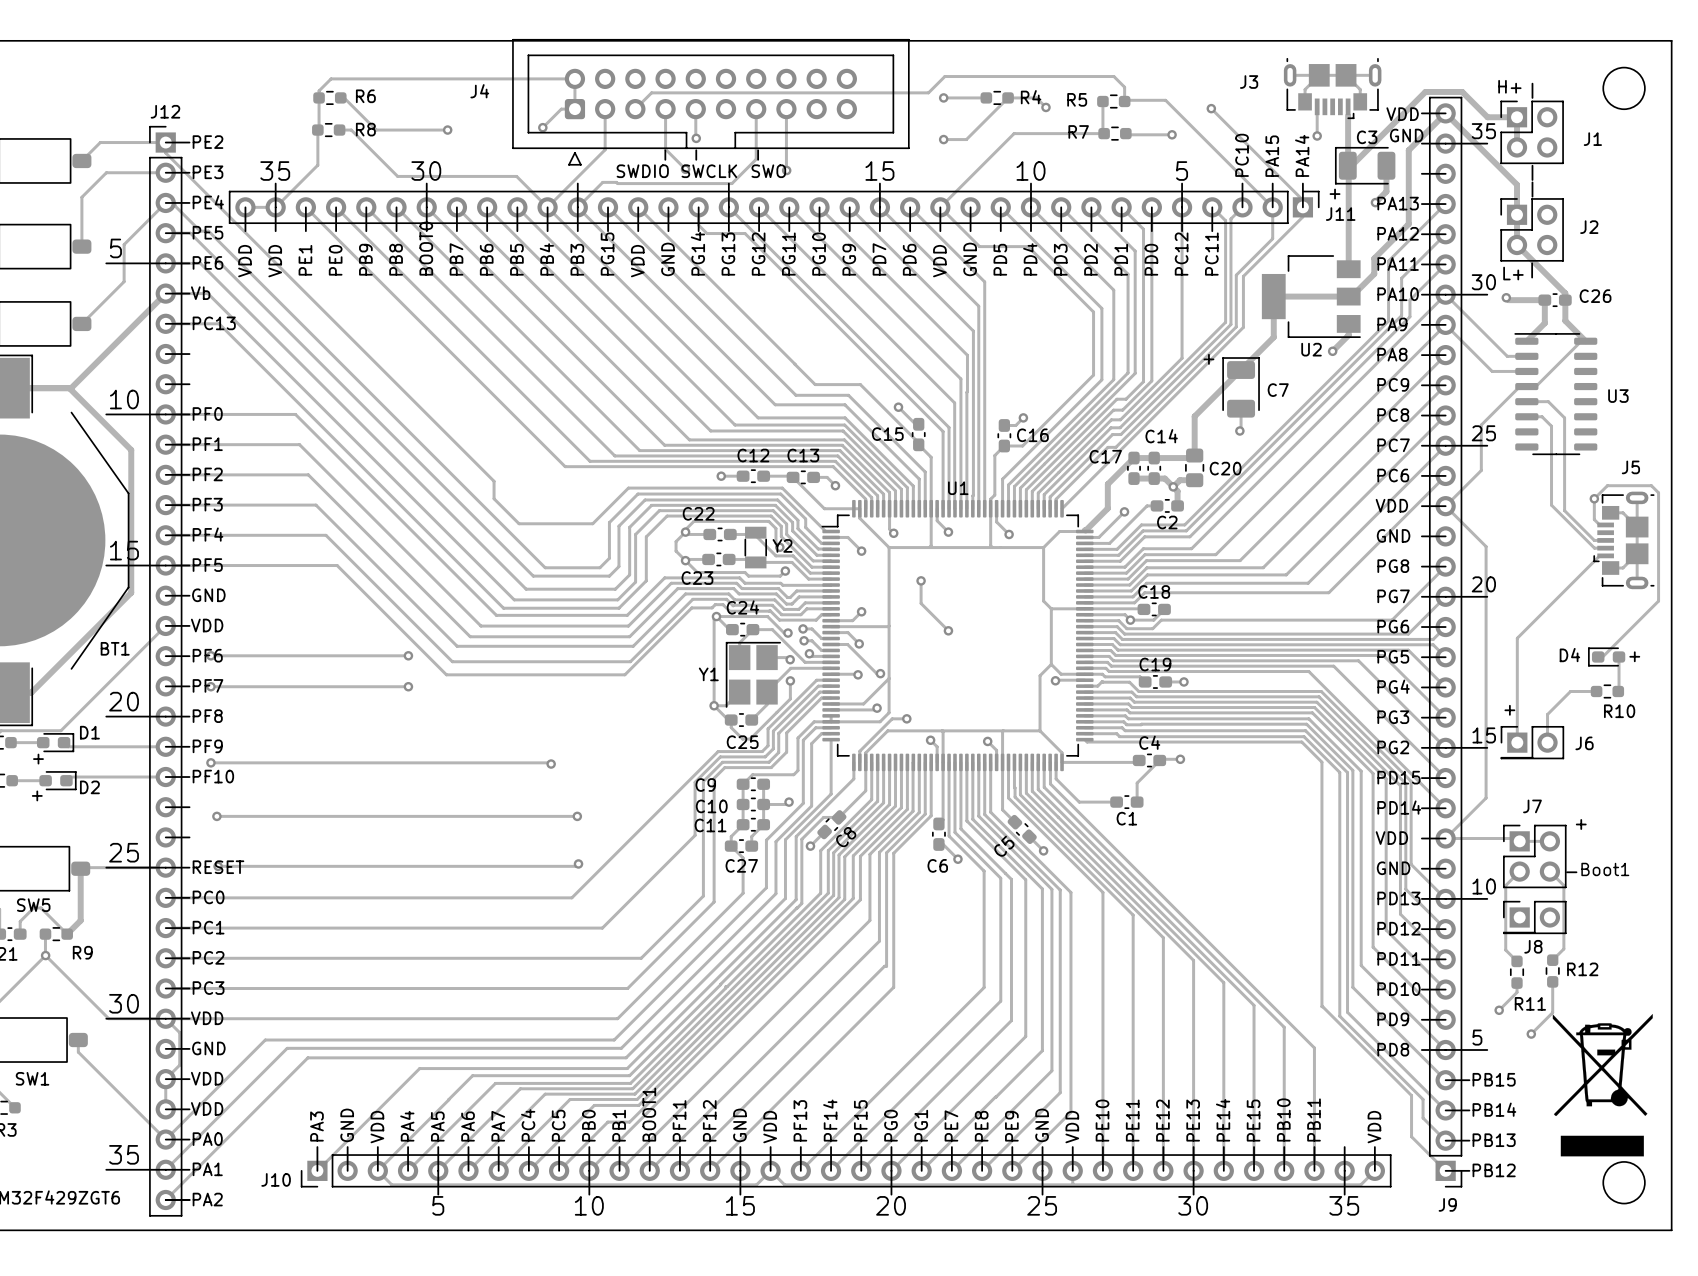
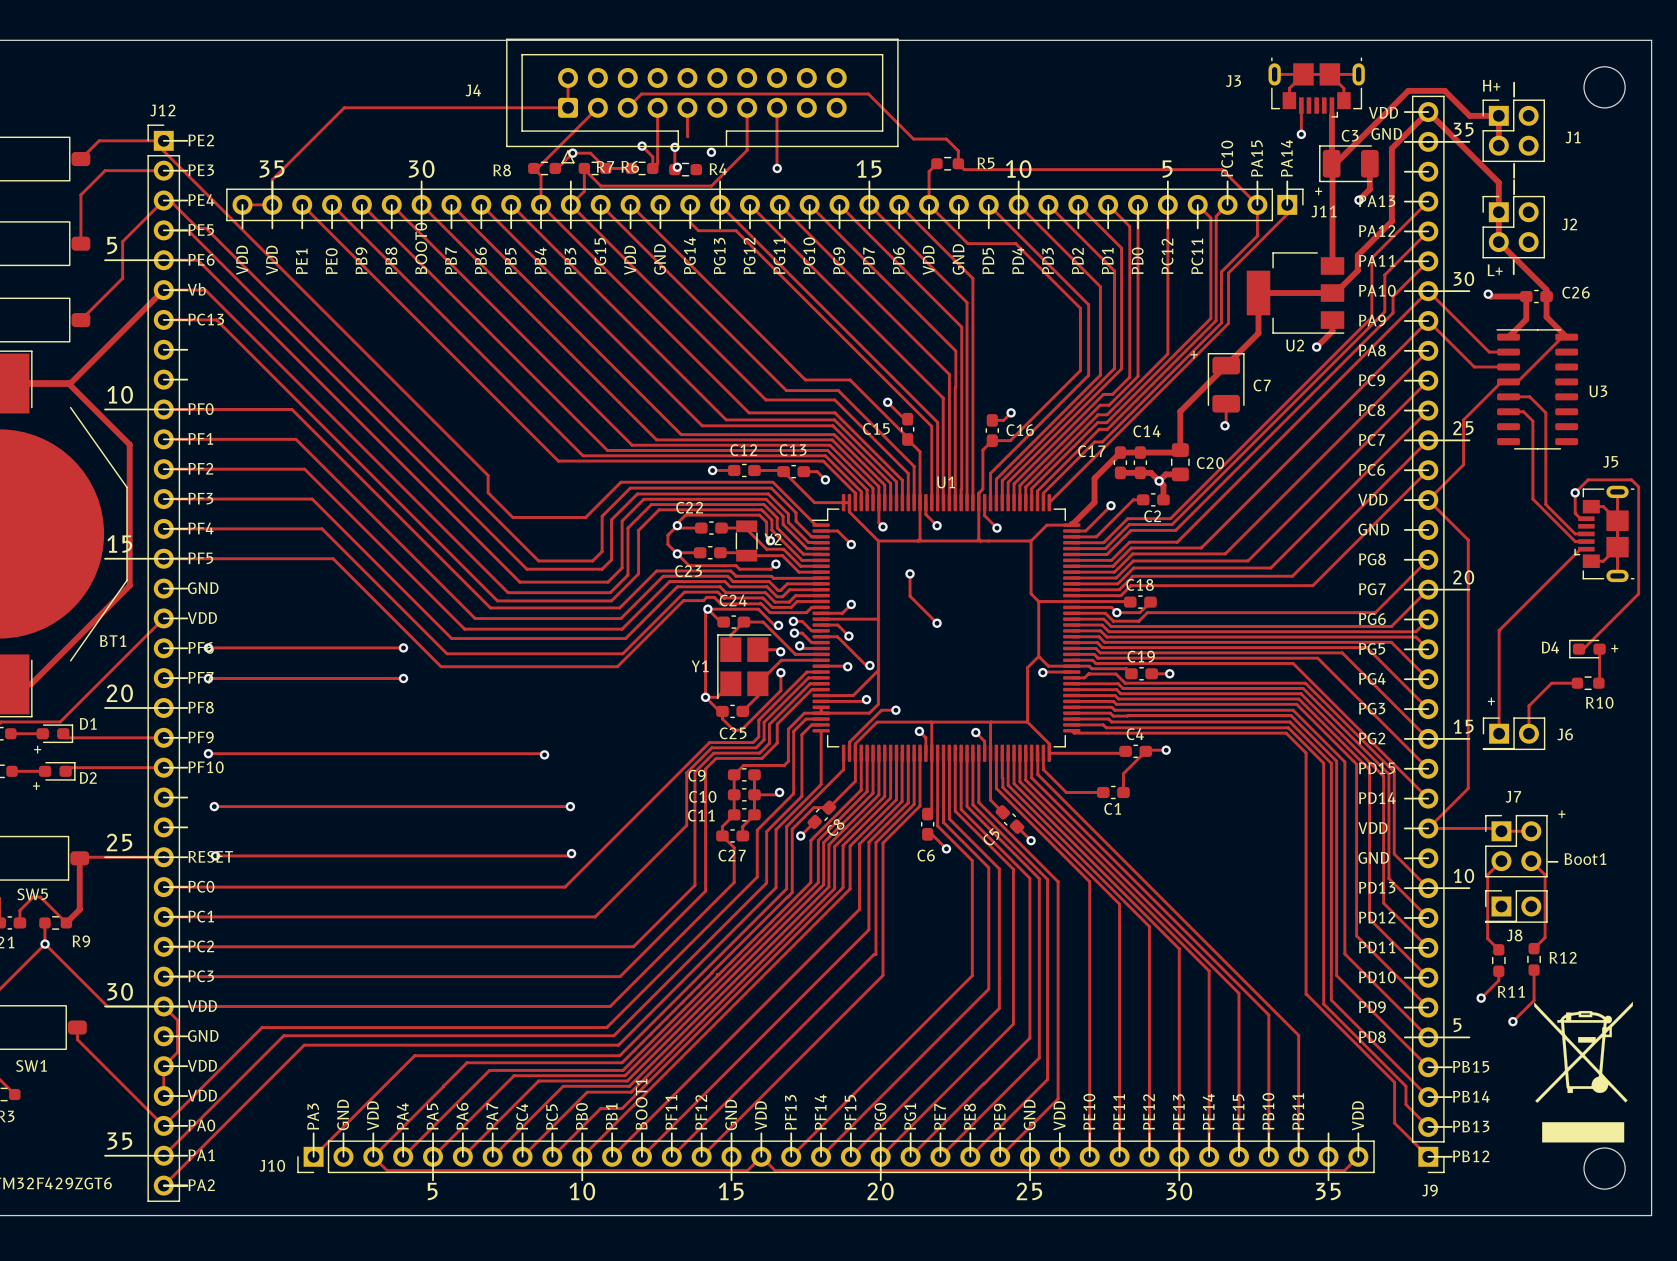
track: (574, 78) (331, 78) (319, 90) (317, 165) (275, 207) -> (554, 107) (344, 107) (272, 179) (272, 204)
track: (649, 95) (651, 92) (928, 92) (944, 76) (1113, 76) (1124, 87) (1124, 101) (1165, 100) (1237, 171) -> (641, 94) (868, 94) (913, 139) (946, 139) (958, 150) (958, 163) (964, 169) (1222, 169)
R6 position: (329, 97) -> (595, 168)
track: (340, 97) (344, 97) (376, 130) (447, 130) -> none
track: (943, 97) (986, 97) -> none
via: (943, 97) -> none
R4 position: (997, 97) -> (685, 169)
R5 name position: R5 (1077, 99) -> R5 (986, 163)
track: (1102, 101) (1104, 133) (1014, 133) (940, 207) -> (936, 163) (929, 171) (929, 204)
R5 position: (1113, 101) -> (947, 163)
track: (1045, 107) (1036, 97) (1008, 97) (966, 139) (943, 139) -> none
via: (1045, 107) -> none
track: (1211, 108) (1302, 200) (1302, 207) -> none
via: (1211, 108) -> none
track: (561, 109) (542, 127) -> none
track: (605, 109) (605, 149) (547, 207) (516, 176) (397, 176) (351, 130) (339, 130) -> (597, 107) (537, 168) (533, 168) (541, 175) (541, 204)
via position: (542, 127) -> (572, 153)
R8 name position: R8 (365, 129) -> R8 (502, 170)
R8 position: (328, 130) -> (544, 168)
via: (447, 130) -> none
R7 position: (1114, 133) -> (642, 168)
track: (1125, 133) (1172, 134) -> none
via: (1172, 134) -> none
via: (696, 138) -> none
via: (943, 139) -> none
via: none -> (642, 146)
track: (665, 149) (685, 169) -> (657, 147) (657, 163) (652, 168) (652, 156) (642, 146)
track: none -> (674, 147) (674, 169)
via: none -> (674, 147)
line: (665, 150) (665, 159) -> none
line: (696, 150) (696, 159) -> none
line: (758, 150) (758, 159) -> none
track: (756, 152) (756, 159) (731, 183) (602, 182) (591, 193) -> (747, 150) (711, 186) (600, 186) (584, 169)
via: none -> (711, 152)
track: none -> (555, 168) (572, 153) (590, 153) (605, 168) (631, 168)
track: none -> (584, 168) (584, 191)
text: SWDIO (642, 171) -> none
text: SWCLK (709, 171) -> none
text: SWO (768, 171) -> none

